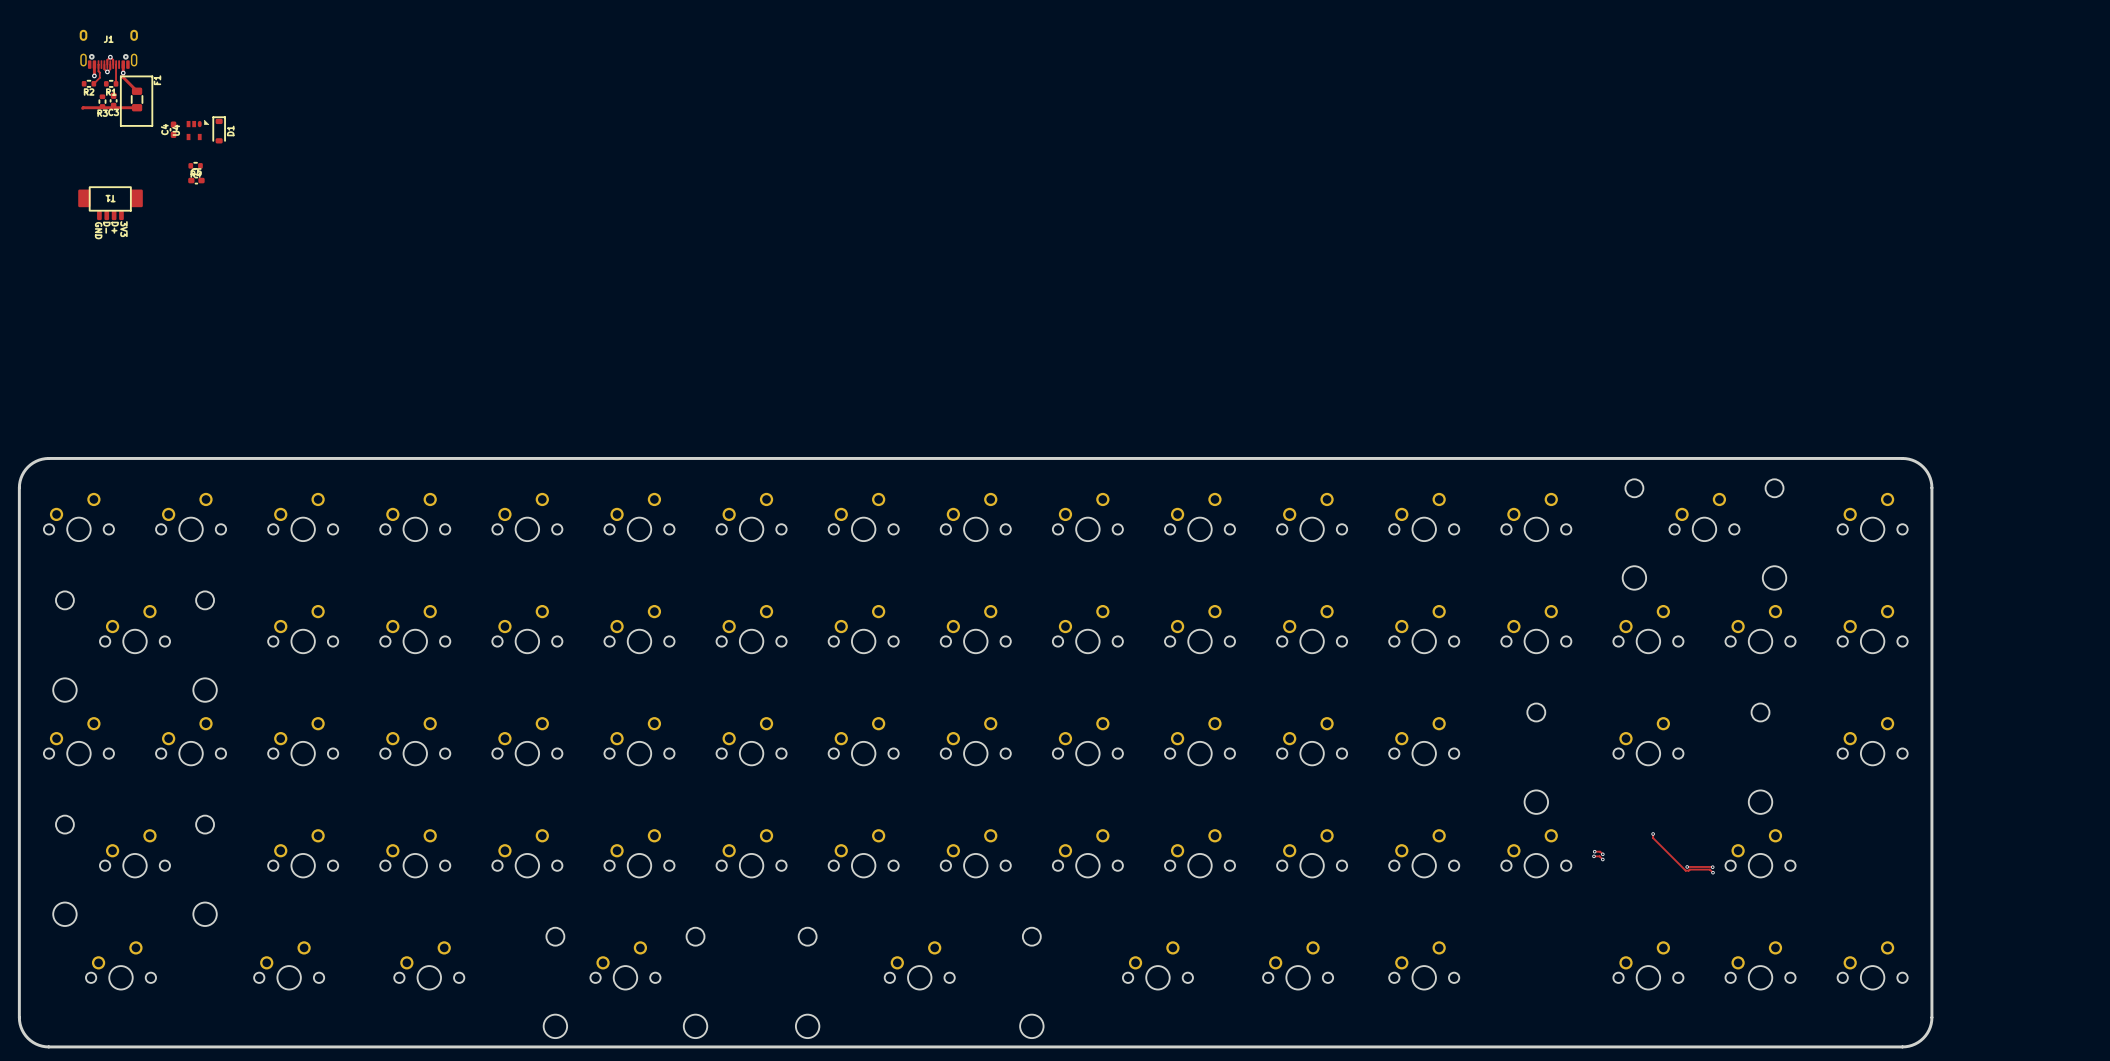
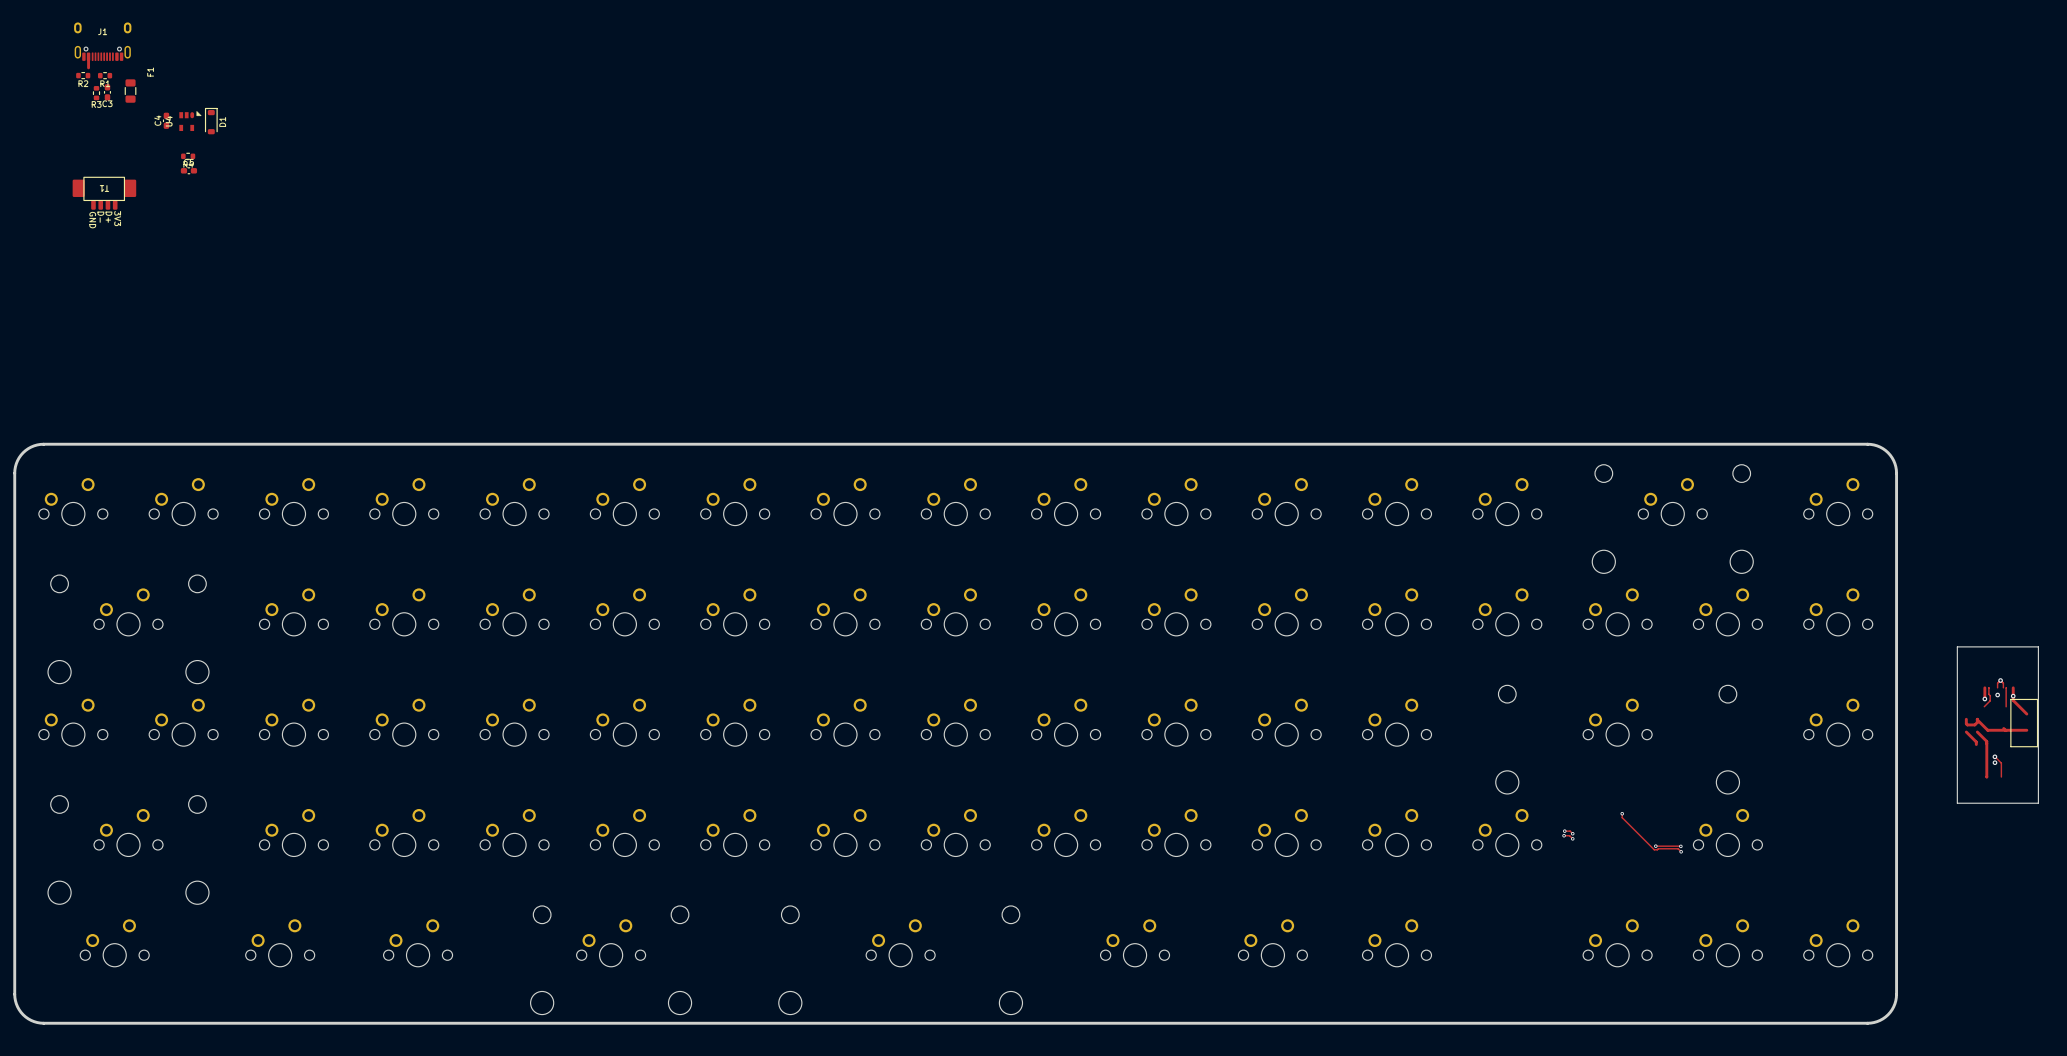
via: (110, 57) -> none
track: (98, 64) (99, 77) (93, 83) -> none
track: (104, 64) (105, 70) (110, 69) (110, 64) -> none
track: (107, 64) (108, 58) (113, 59) (113, 64) -> none
track: (116, 64) (116, 83) -> none
track: (123, 64) (123, 77) (137, 91) -> none
via: (107, 71) -> none
via: (123, 73) -> none
via: (94, 75) -> none
line: (120, 76) (152, 76) (152, 125) (120, 125) (120, 76) -> none
track: (137, 107) (82, 108) -> none
board edge: none -> (1957, 646) (2038, 646) (2038, 803) (1957, 803) (1957, 646)
via: none -> (2000, 680)
track: none -> (1984, 687) (1984, 699)
track: none -> (1989, 687) (1990, 700) (1984, 706)
track: none -> (1997, 687) (1999, 681) (2003, 683) (2003, 687)
track: none -> (2006, 687) (2006, 706)
track: none -> (2013, 687) (2013, 700) (2026, 714)
via: none -> (1997, 695)
via: none -> (2013, 696)
via: none -> (1984, 699)
line: none -> (2010, 699) (2037, 699) (2037, 746) (2010, 746) (2010, 699)
track: none -> (1966, 719) (1967, 724) (1974, 724) (1977, 719)
track: none -> (1977, 719) (1987, 730) (2026, 730)
track: none -> (2003, 728) (2005, 730)
track: none -> (1966, 732) (1976, 742) (1976, 744)
track: none -> (1977, 732) (1986, 741) (1986, 777)
track: none -> (1994, 756) (2001, 763) (2001, 777)
via: none -> (1994, 756)
via: none -> (1994, 762)

